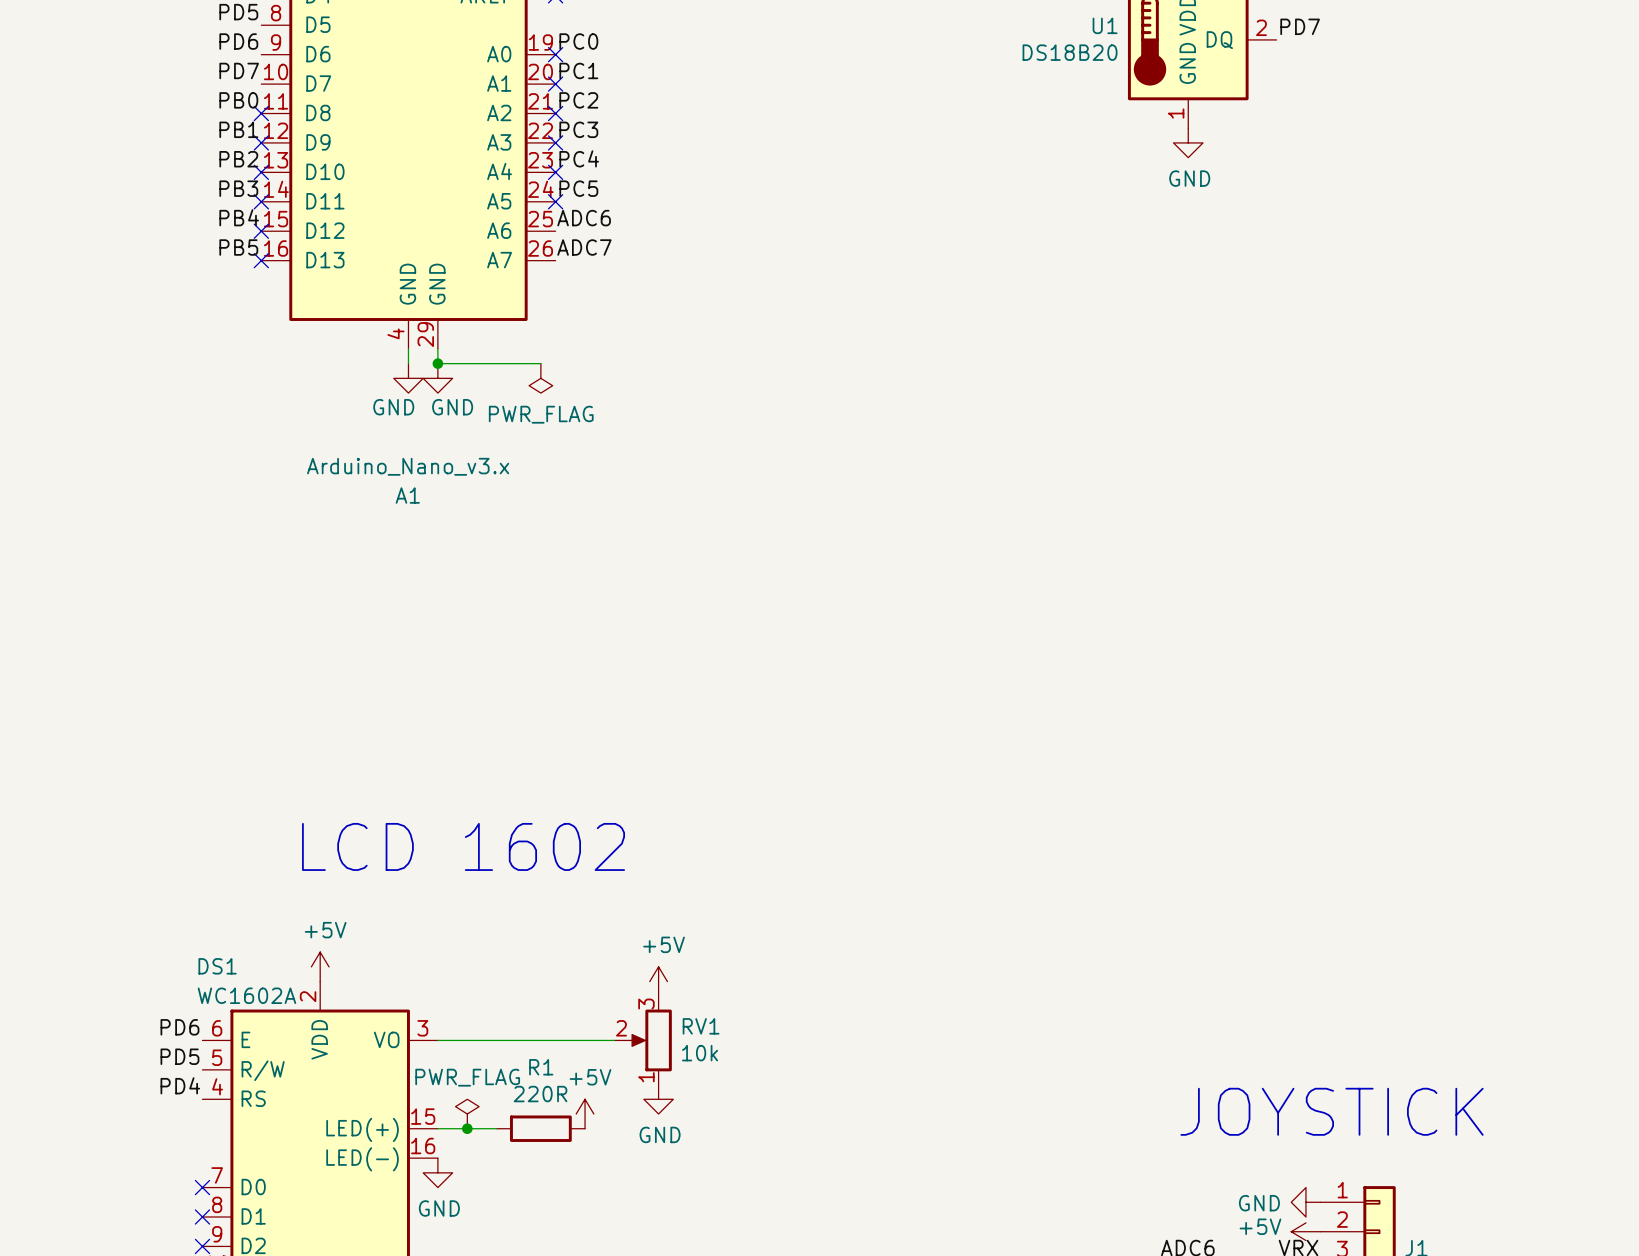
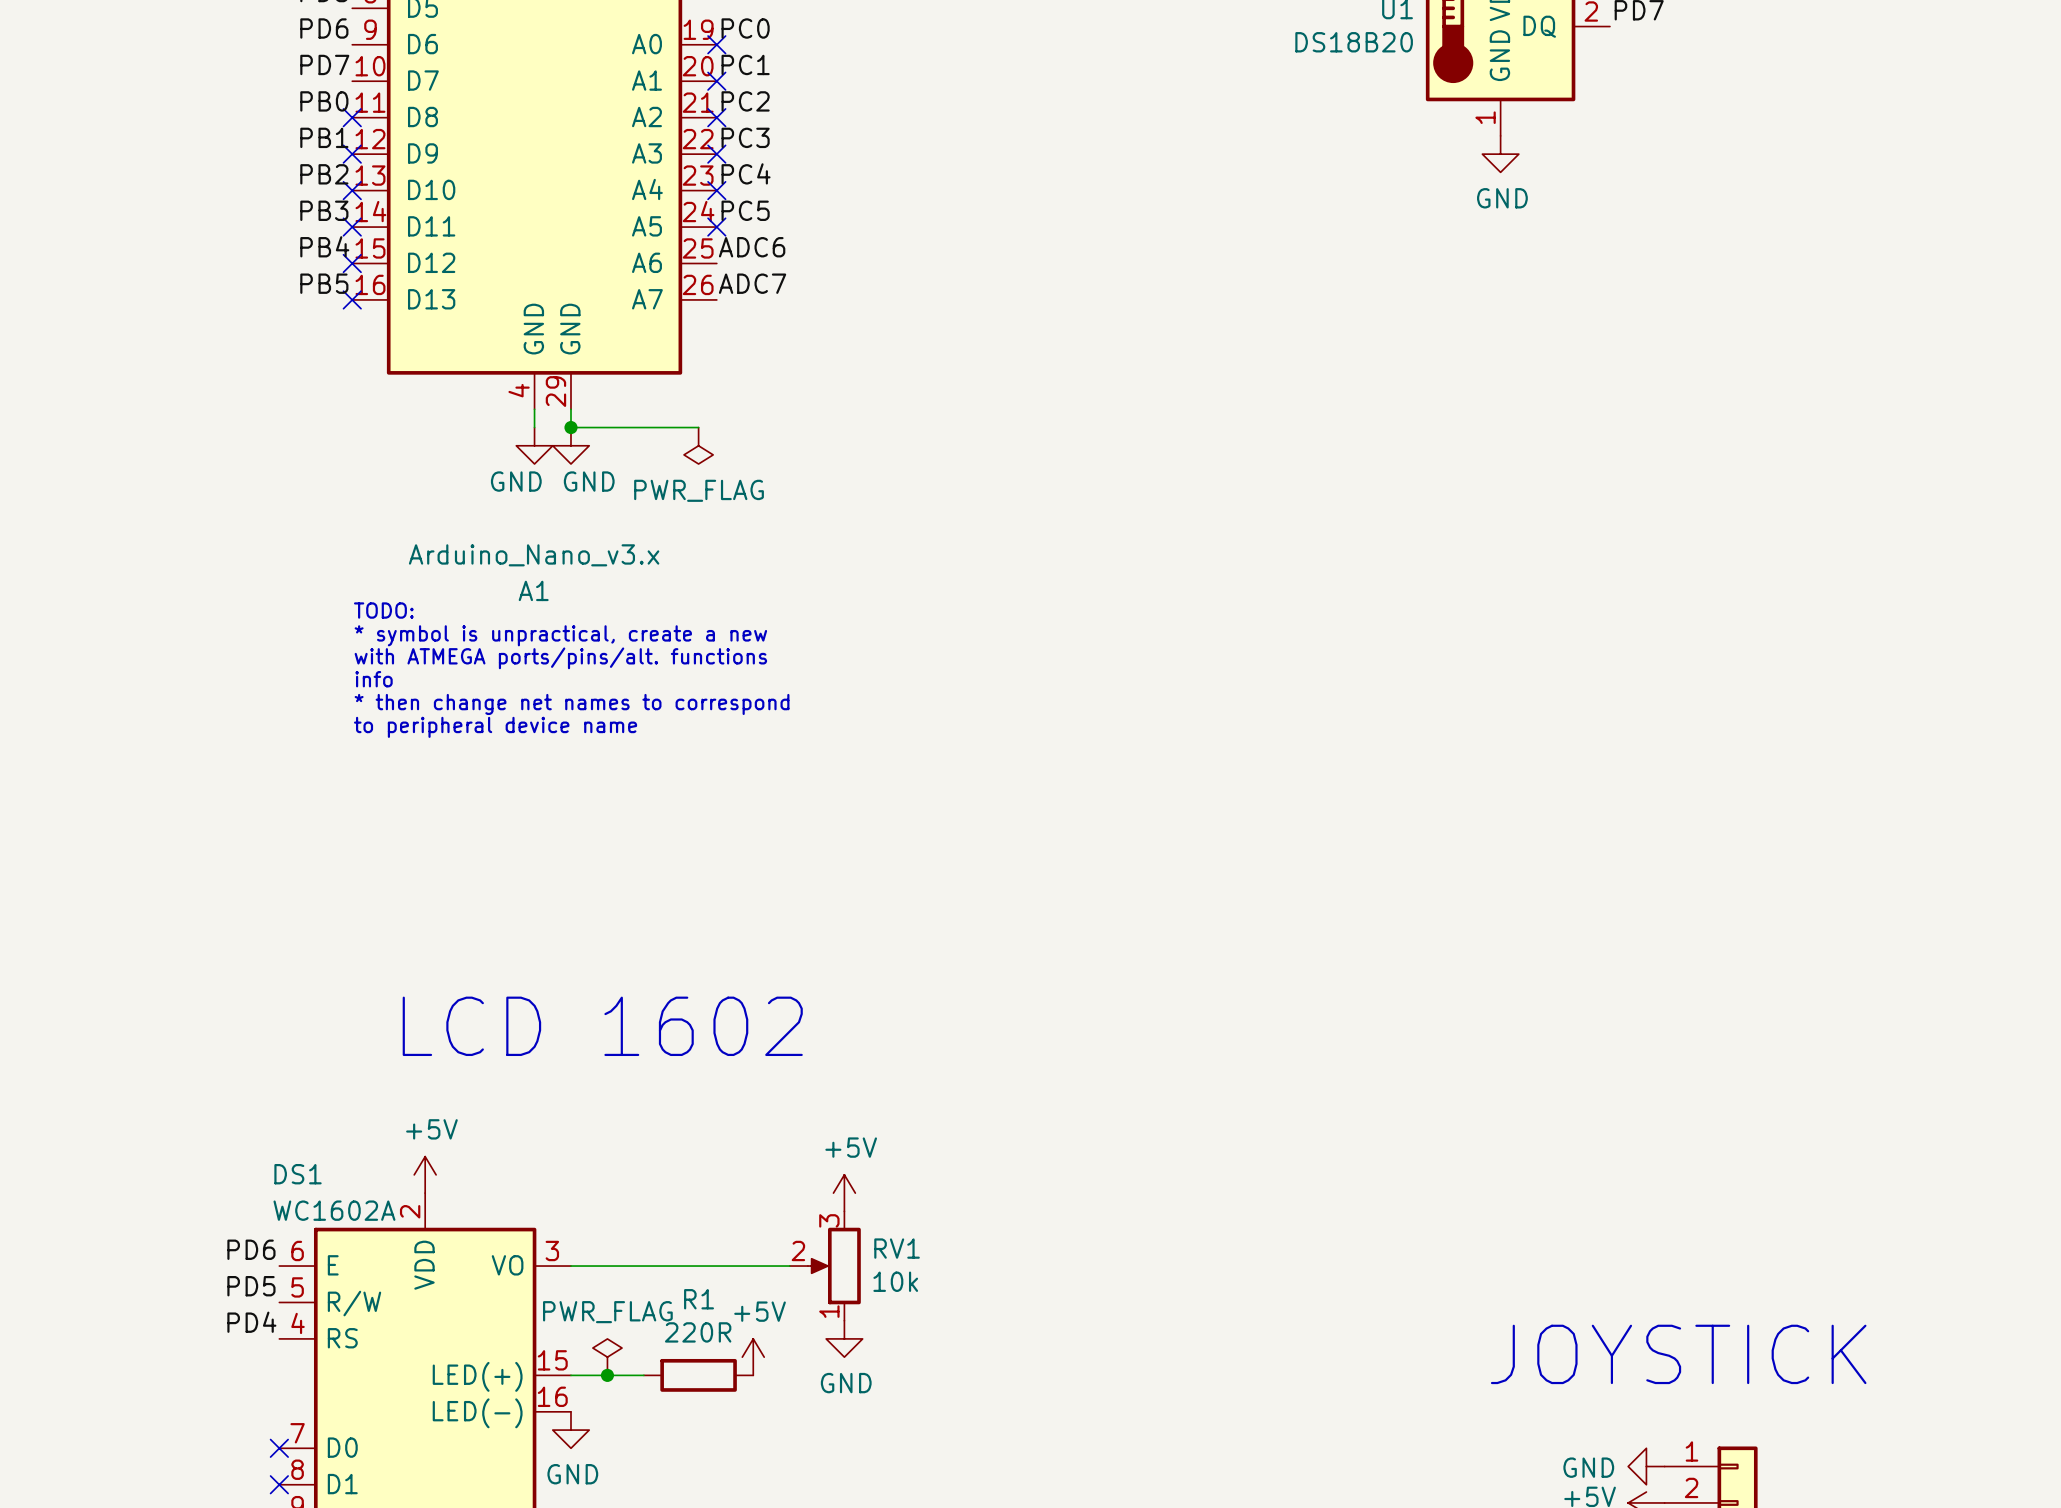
text: none -> TODO: (383, 610)
text: none -> * symbol is unpractical, create a new (560, 635)
text: none -> with ATMEGA ports/pins/alt. functions (560, 658)
text: none -> info (374, 679)
text: none -> * then change net names to correspond (572, 704)
text: none -> to peripheral device name (495, 727)

